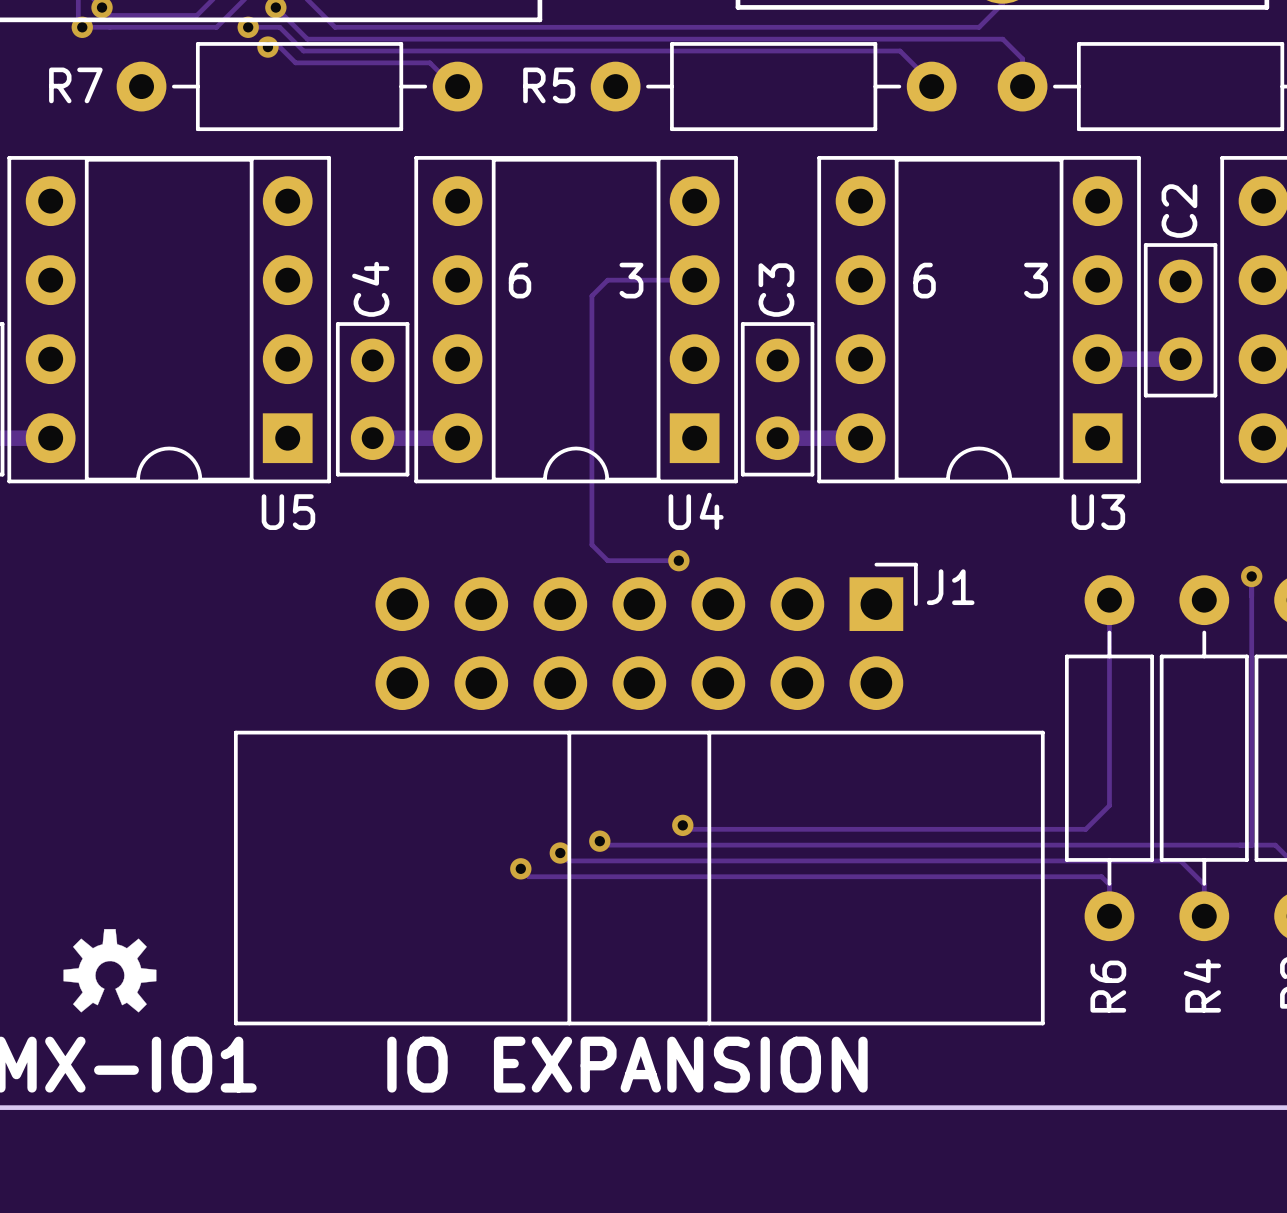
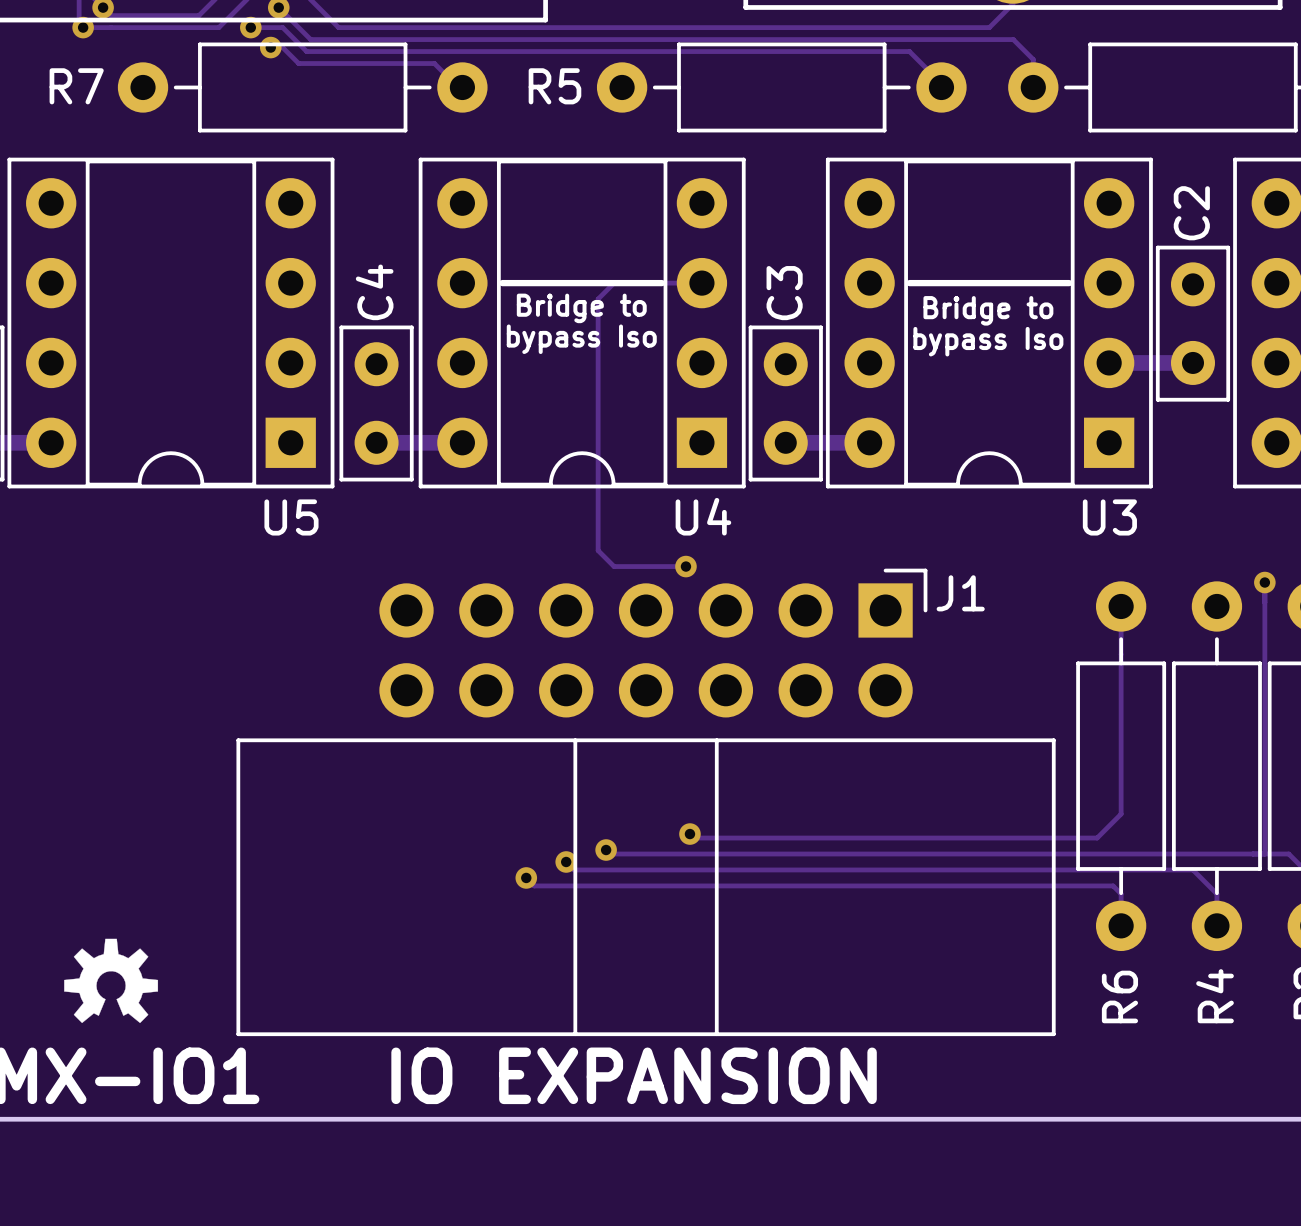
line: none -> (502, 283) (662, 283)
text: 6 (520, 280) -> none
text: 3 (631, 280) -> none
line: none -> (909, 283) (1069, 283)
text: 6 (924, 280) -> none
text: 3 (1036, 280) -> none
text: none -> Bridge to (581, 308)
text: none -> Bridge to (988, 310)
text: none -> bypass Iso (581, 339)
text: none -> bypass Iso (988, 341)

